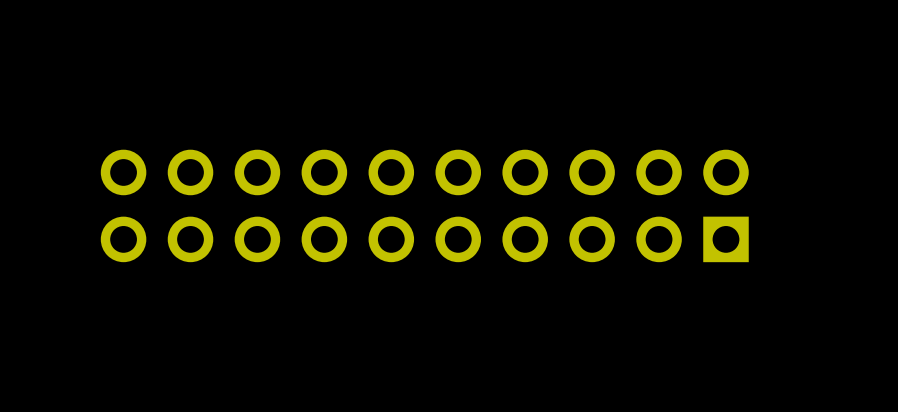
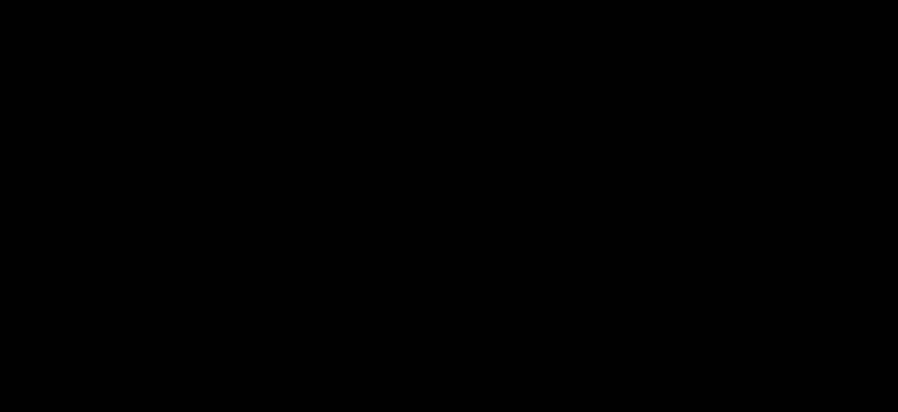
part: (424, 205) -> none

